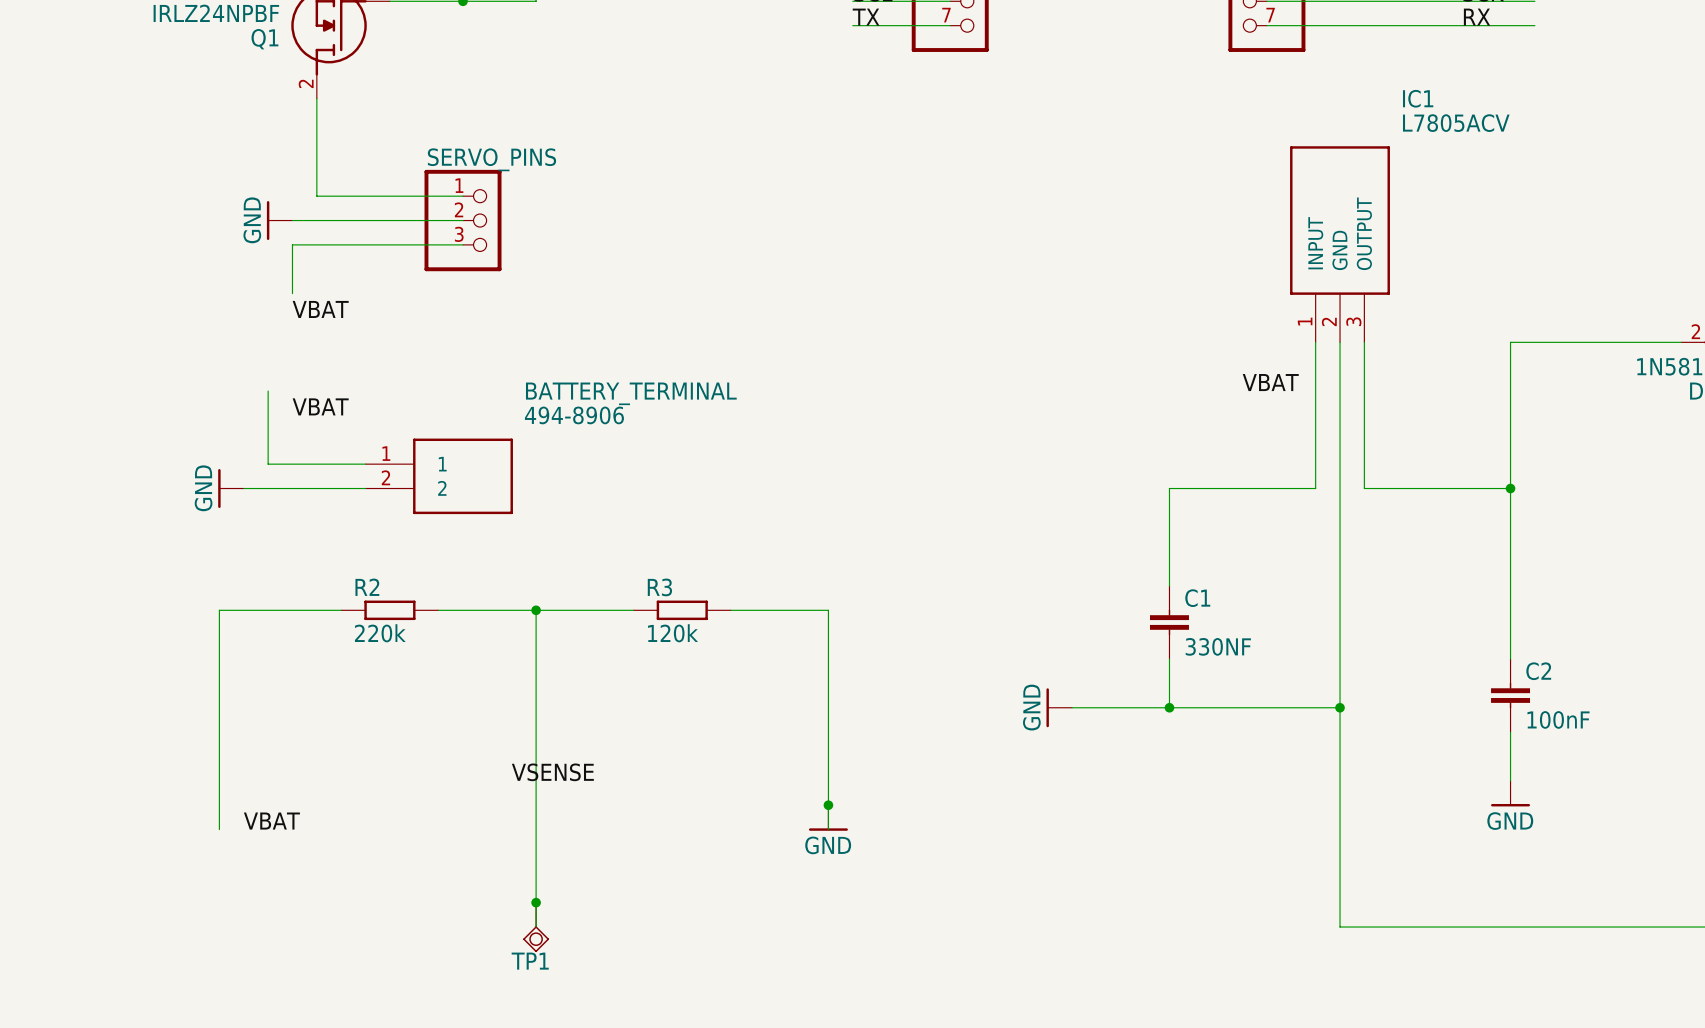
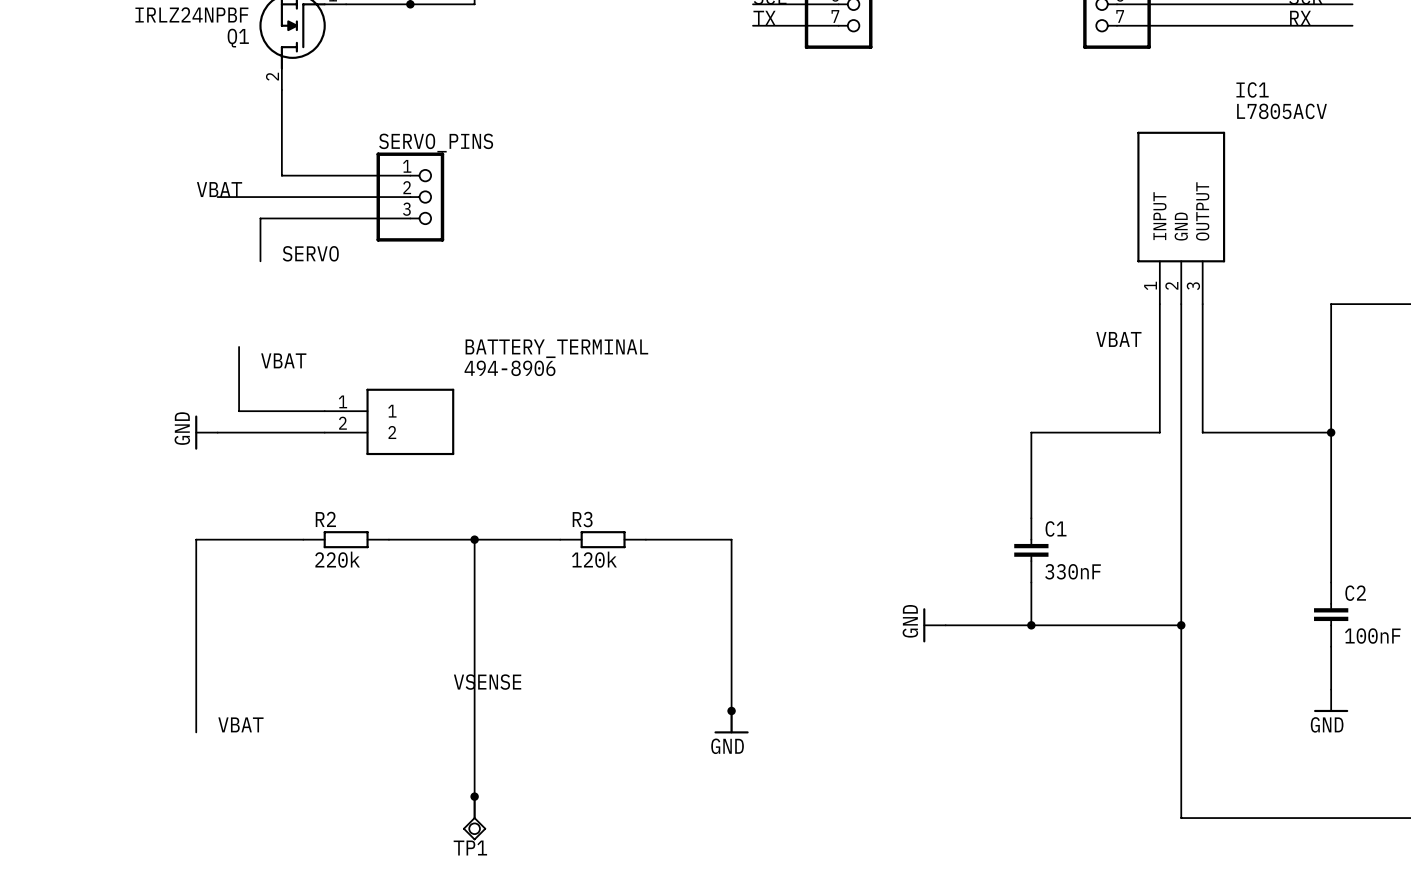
power symbol: GND (279, 220) -> none
label: none -> SERVO (310, 253)
label position: VBAT (320, 309) -> VBAT (219, 189)
C1 value: 330NF (1218, 646) -> 330nF (1072, 571)

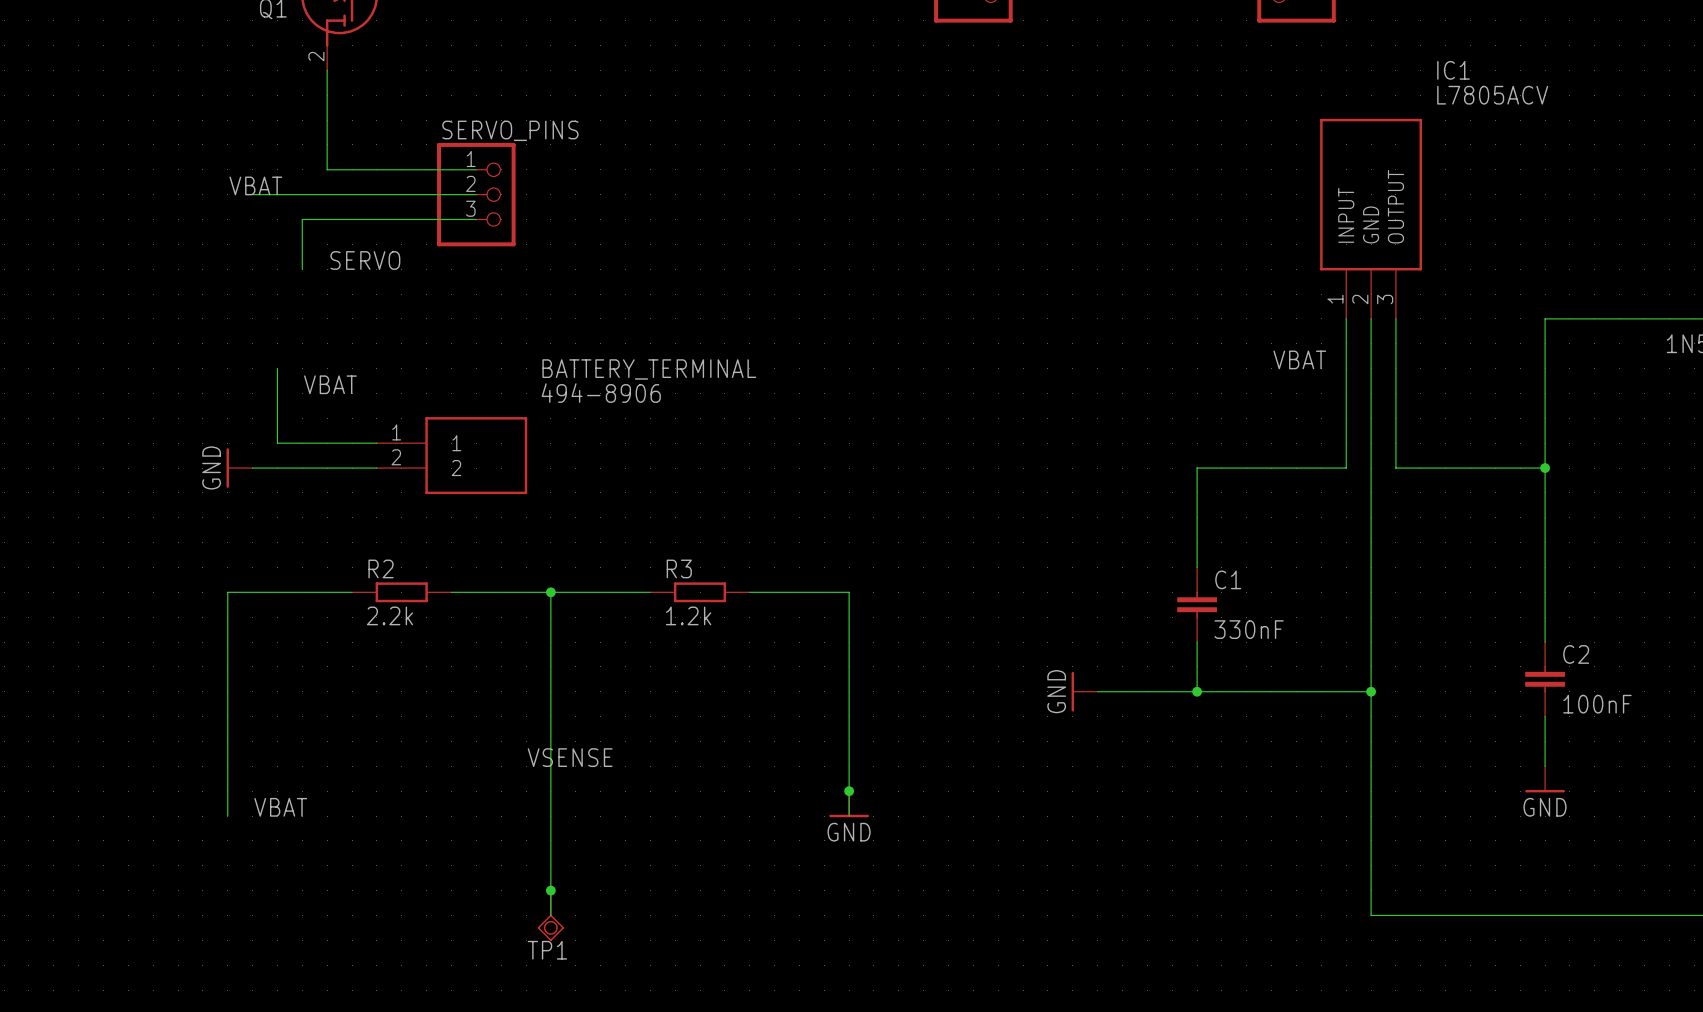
R2 value: 220k (337, 559) -> 2.2k (389, 615)
R3 value: 120k (594, 559) -> 1.2k (688, 615)

